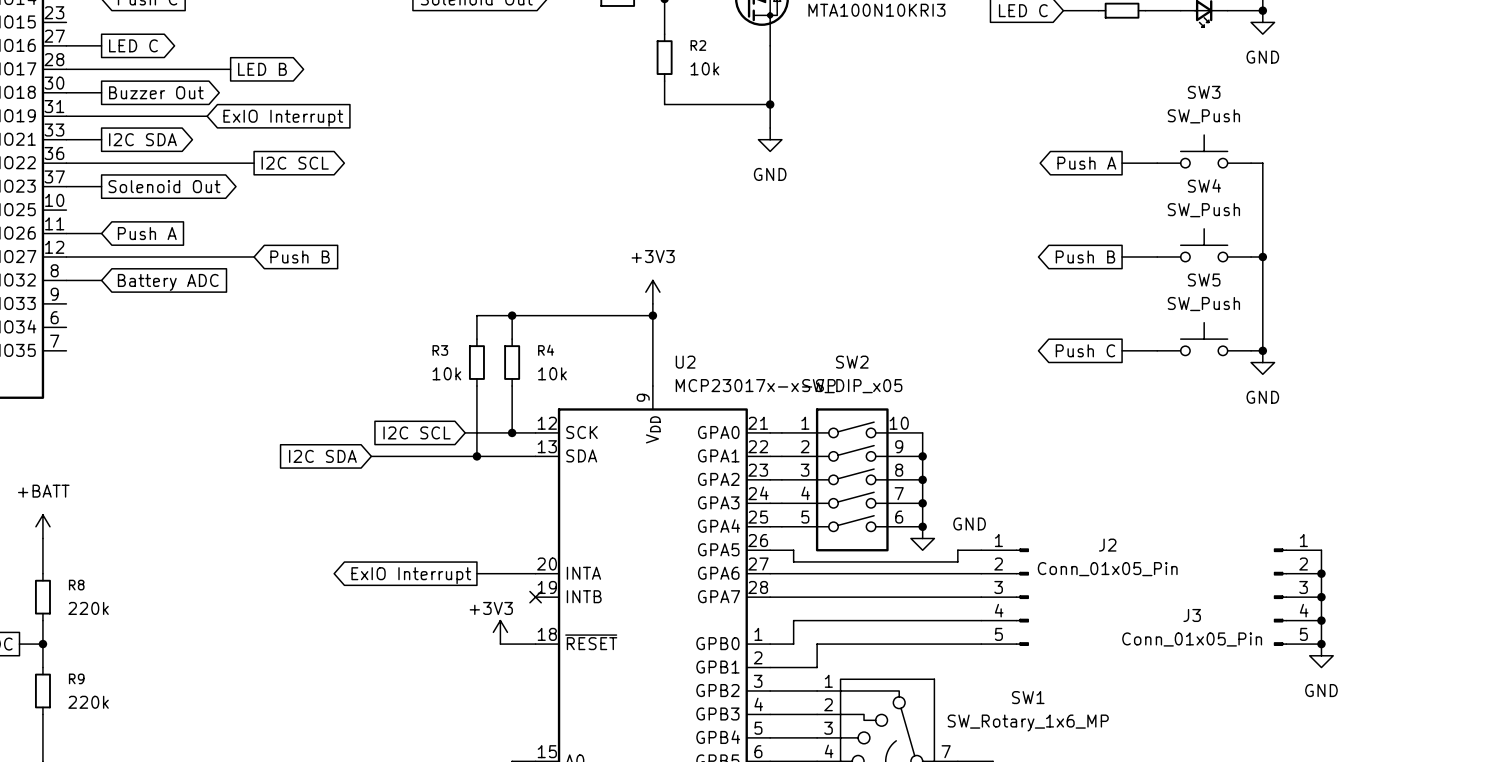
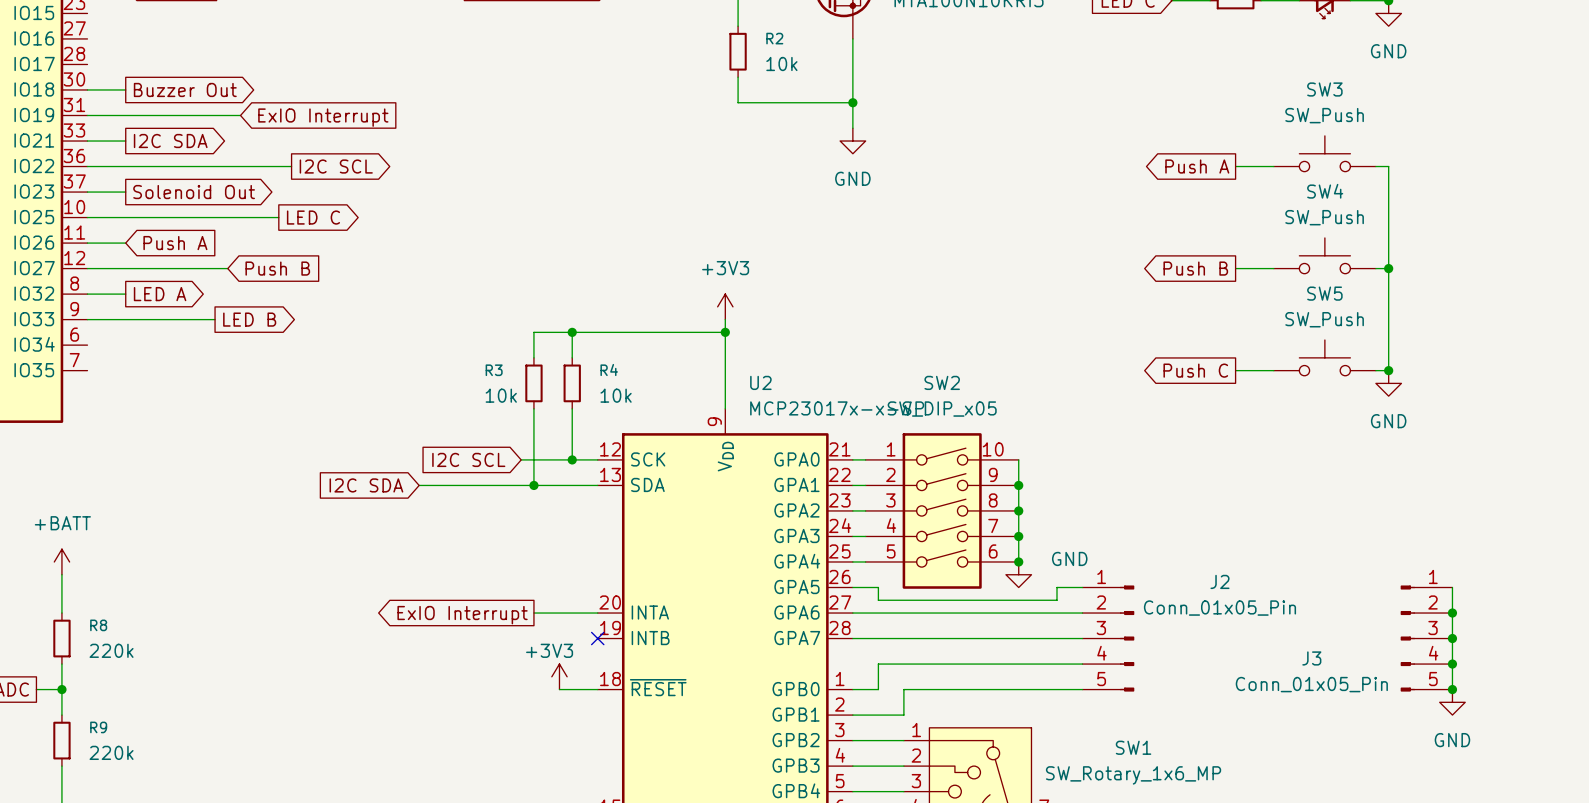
wire: (66, 45) (101, 45) -> none
global label position: LED C (133, 45) -> LED C (313, 217)
wire: (66, 69) (230, 69) -> none
global label: LED B (262, 69) -> none
wire: none -> (87, 217) (278, 217)
wire: (195, 256) (254, 256) -> none
global label position: Push B (300, 256) -> Push B (277, 268)
global label shape: input (168, 282) -> output (160, 294)
global label: Battery ADC (168, 282) -> LED A (160, 294)
wire: none -> (87, 319) (215, 319)
global label: none -> LED B (249, 319)

